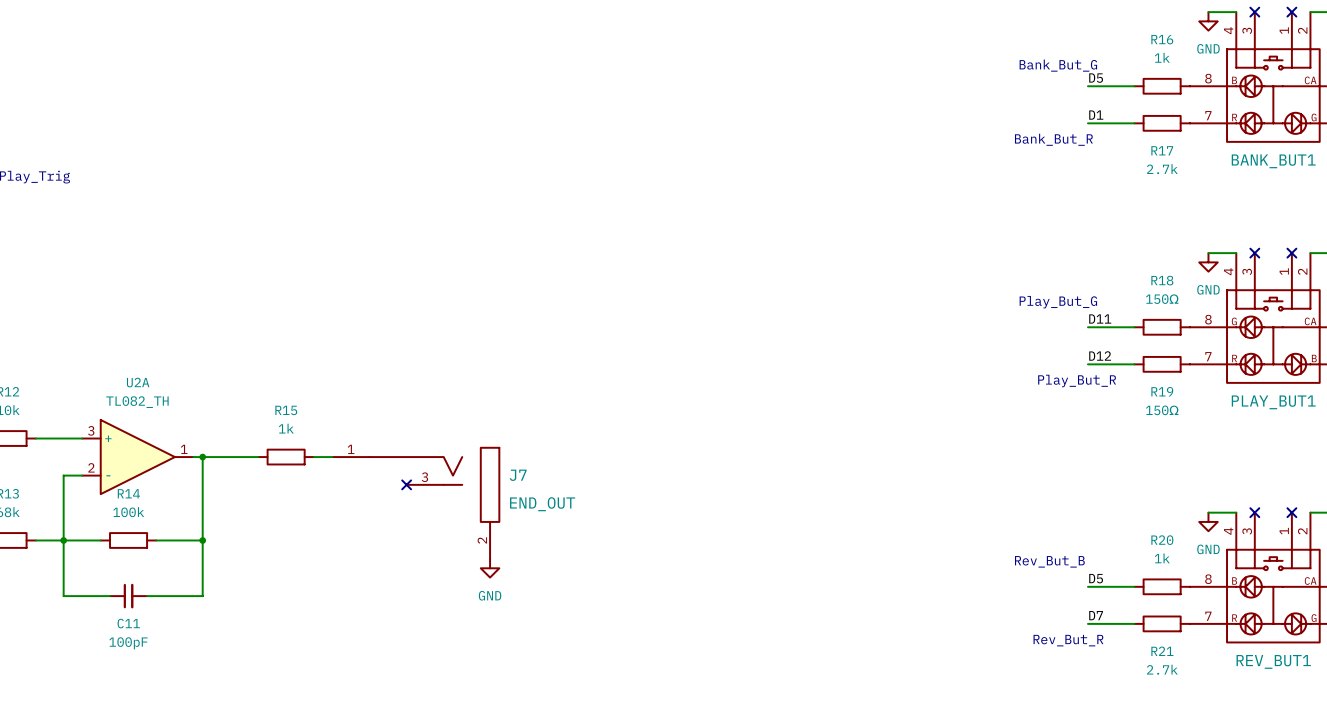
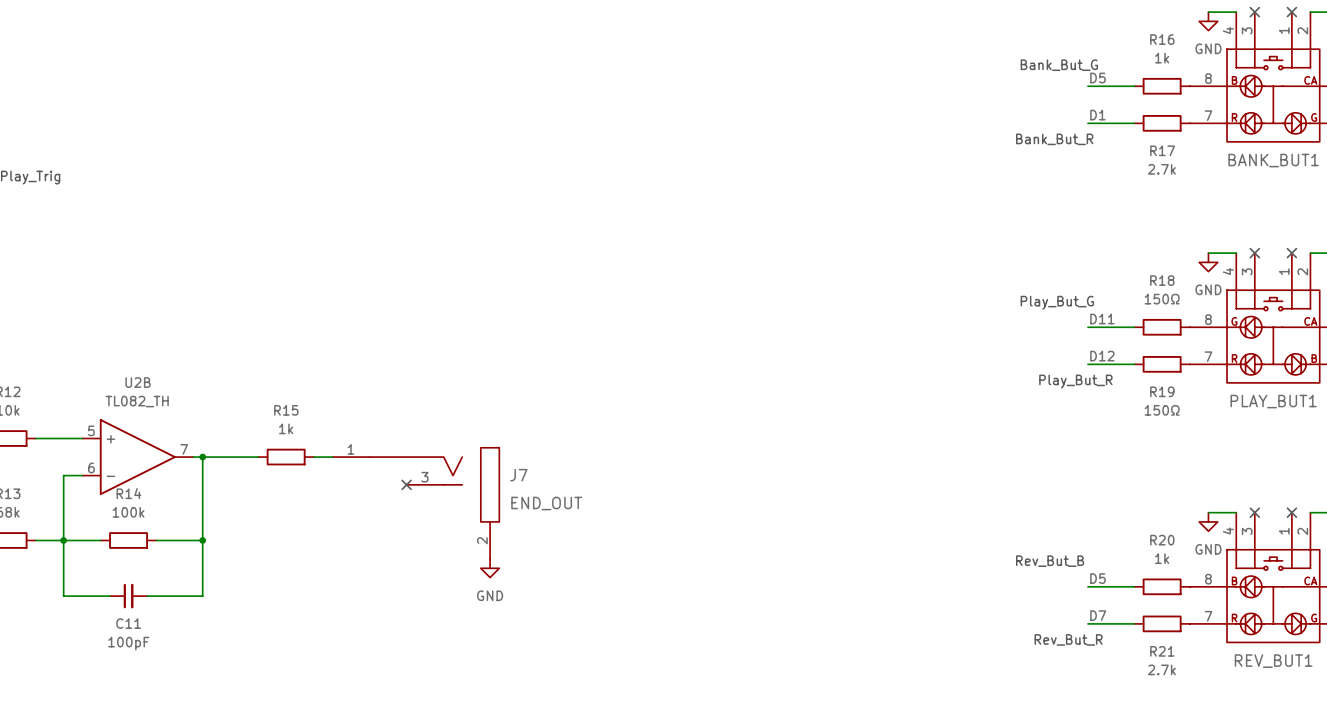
U2A name: U2A (138, 382) -> U2B (138, 382)
U2A pin number: 3 (91, 430) -> 5 (91, 430)
U2A pin number: 1 (184, 449) -> 7 (184, 449)
U2A pin number: 2 (91, 467) -> 6 (91, 467)

